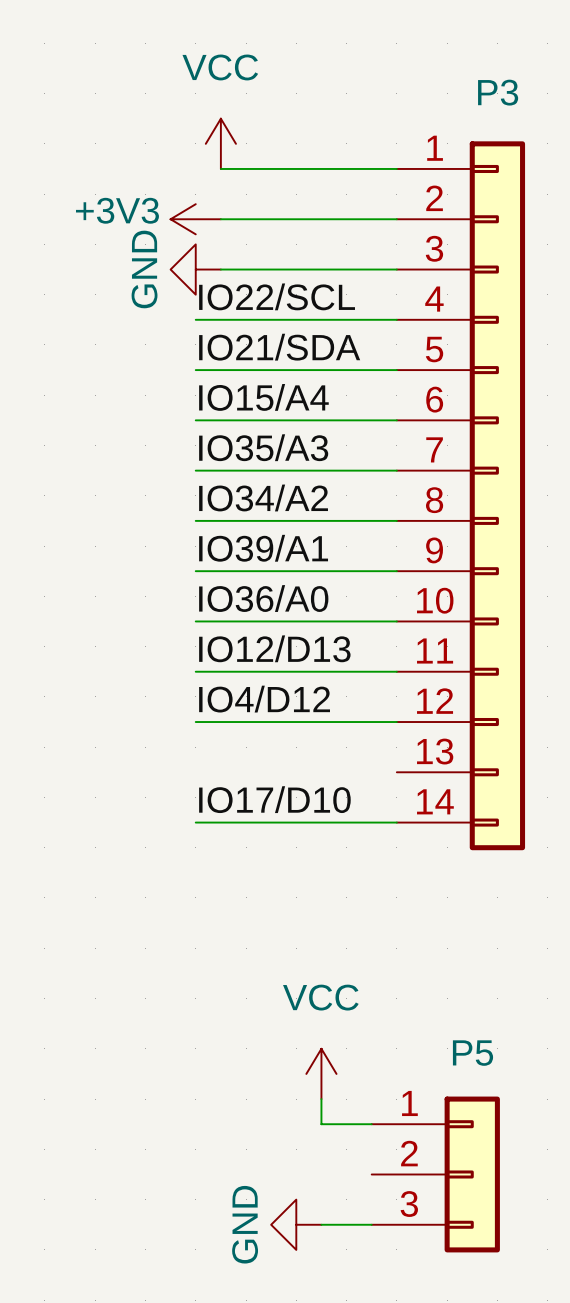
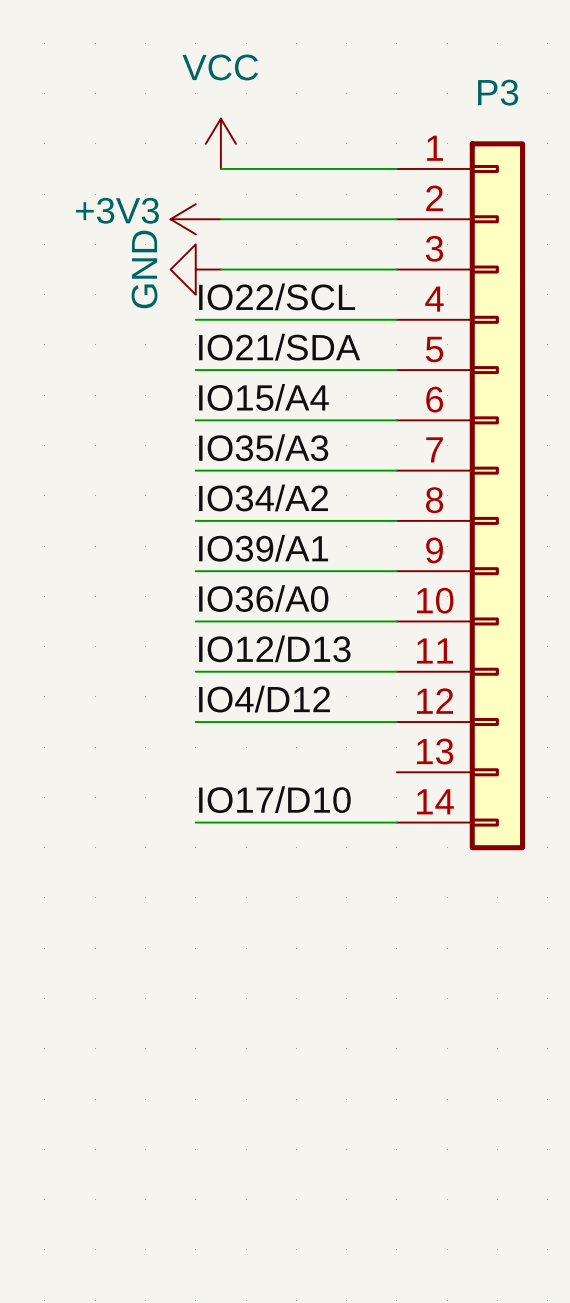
power symbol: VCC (321, 1073) -> none
wire: (321, 1099) (321, 1124) (371, 1124) -> none
P5: (435, 1174) -> none
power symbol: GND (296, 1224) -> none
wire: (321, 1224) (371, 1224) -> none

